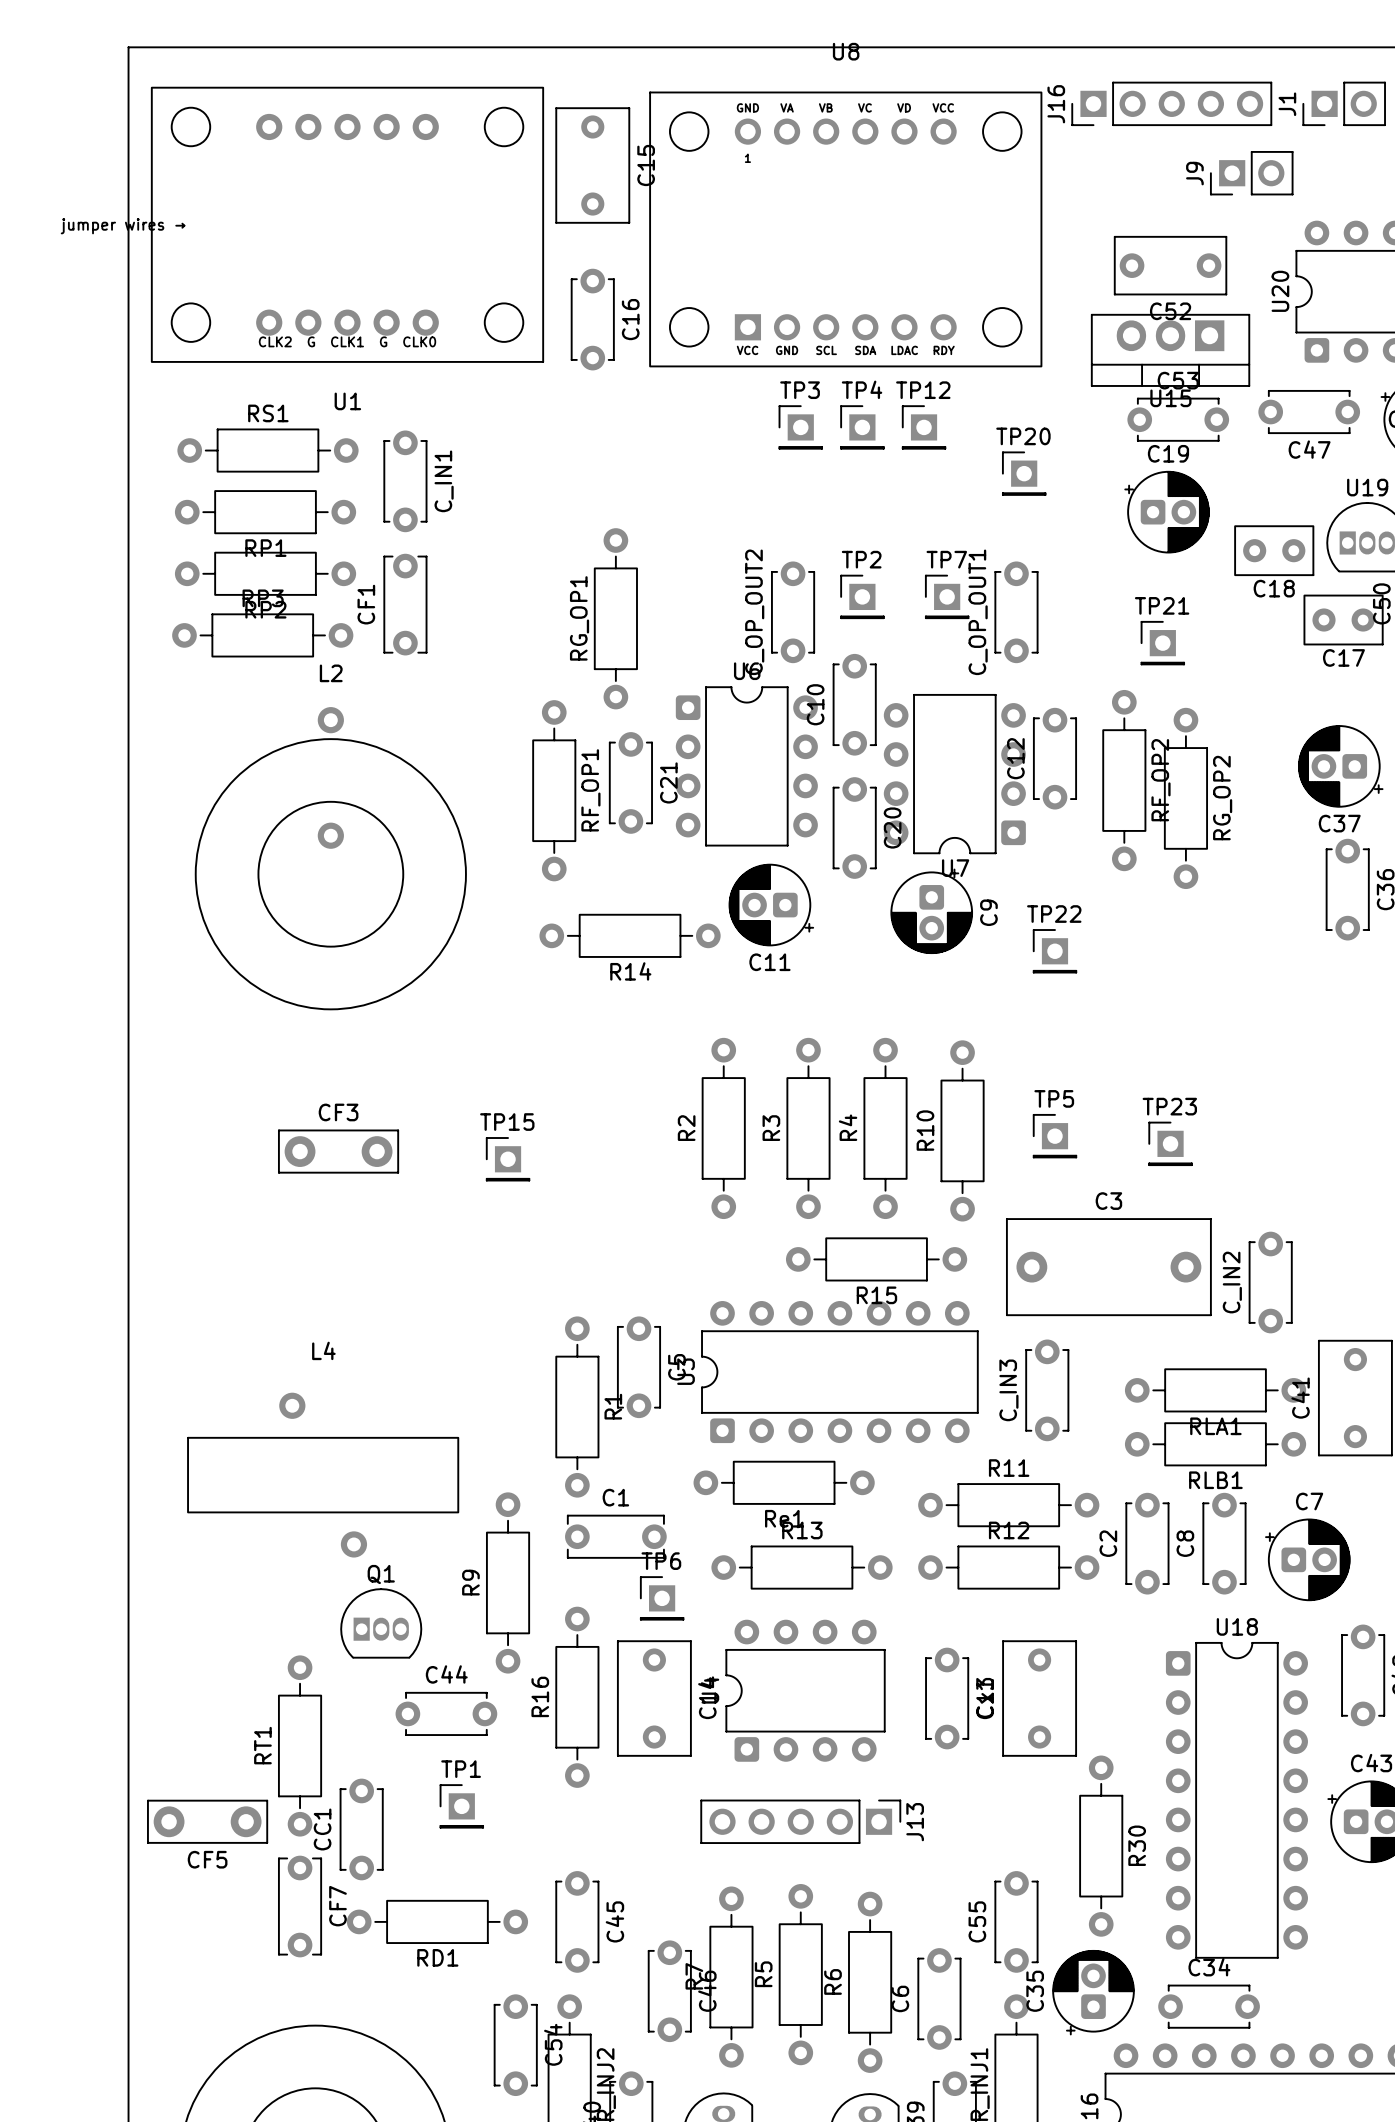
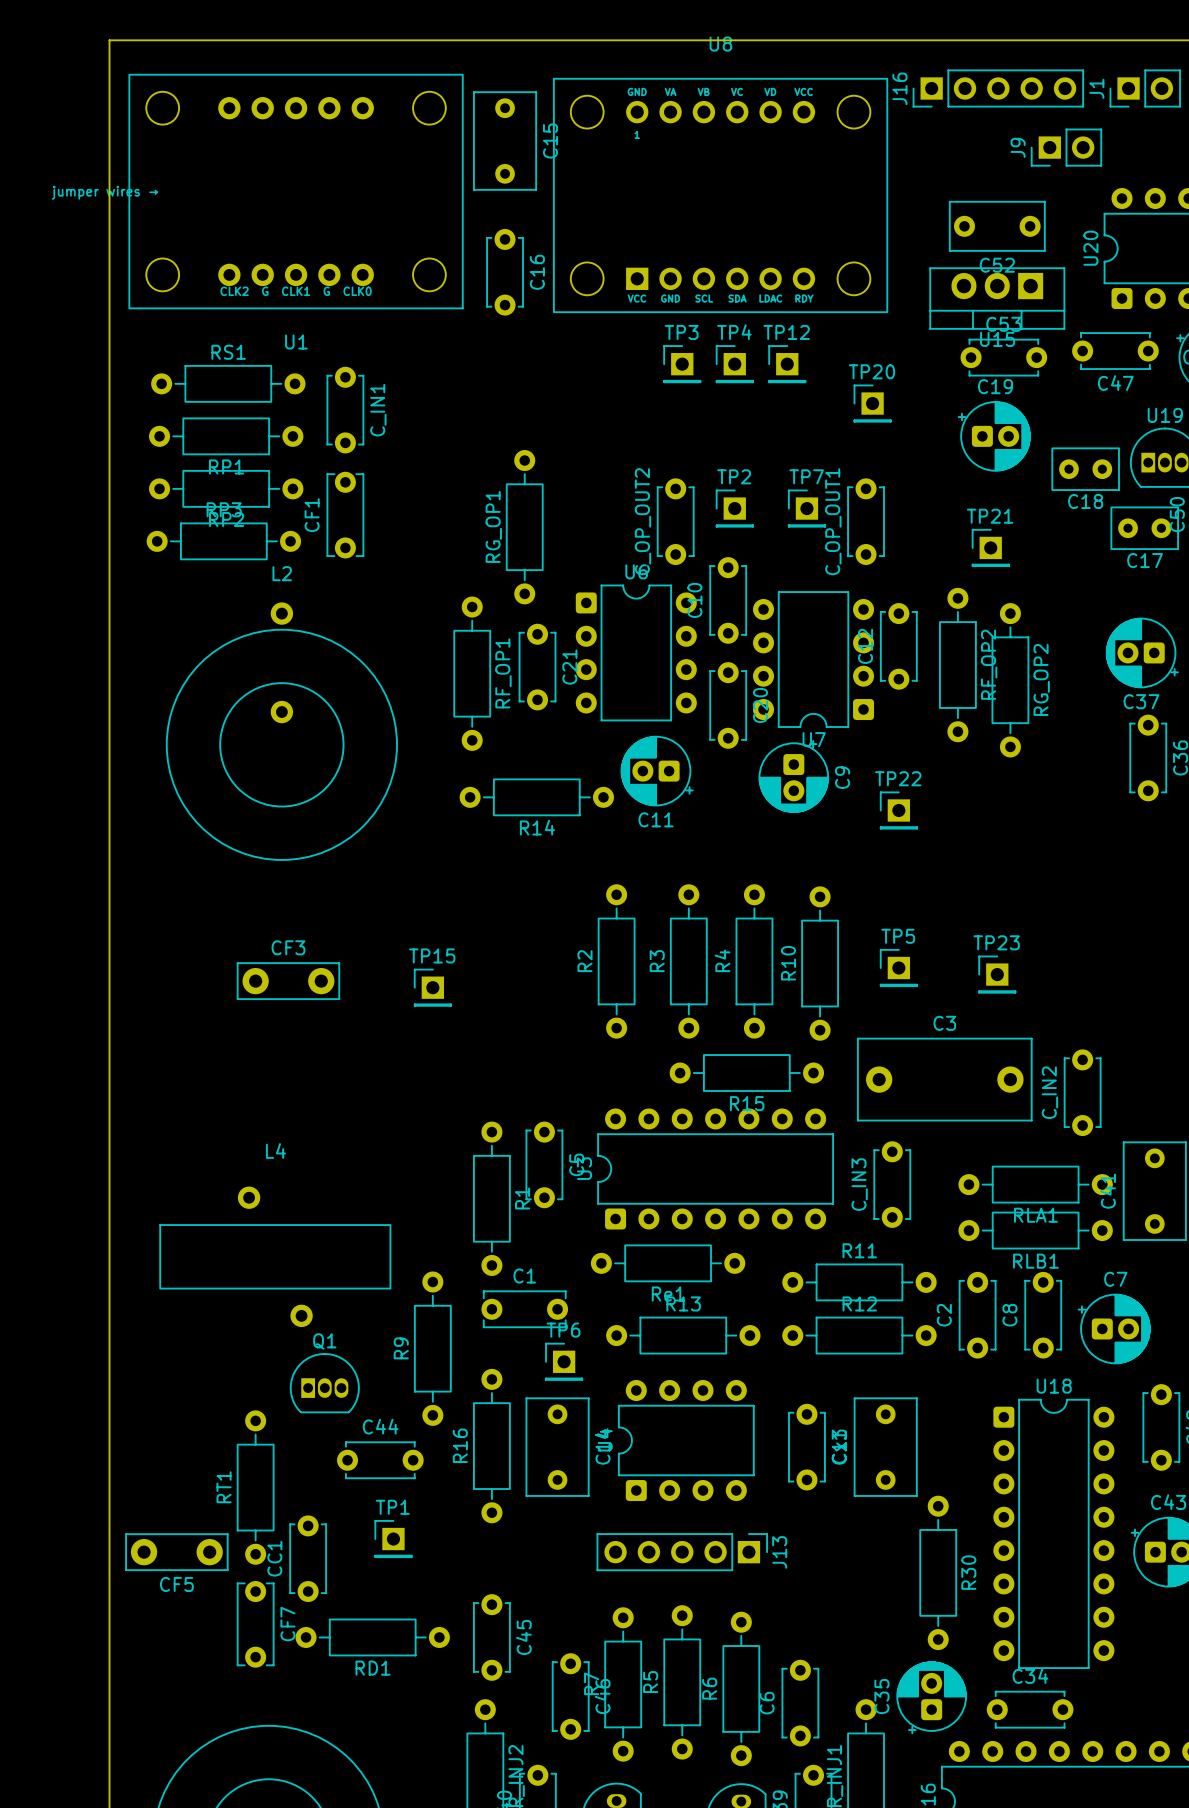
C55: (1016, 1921) -> none
C54: (515, 2045) -> none

